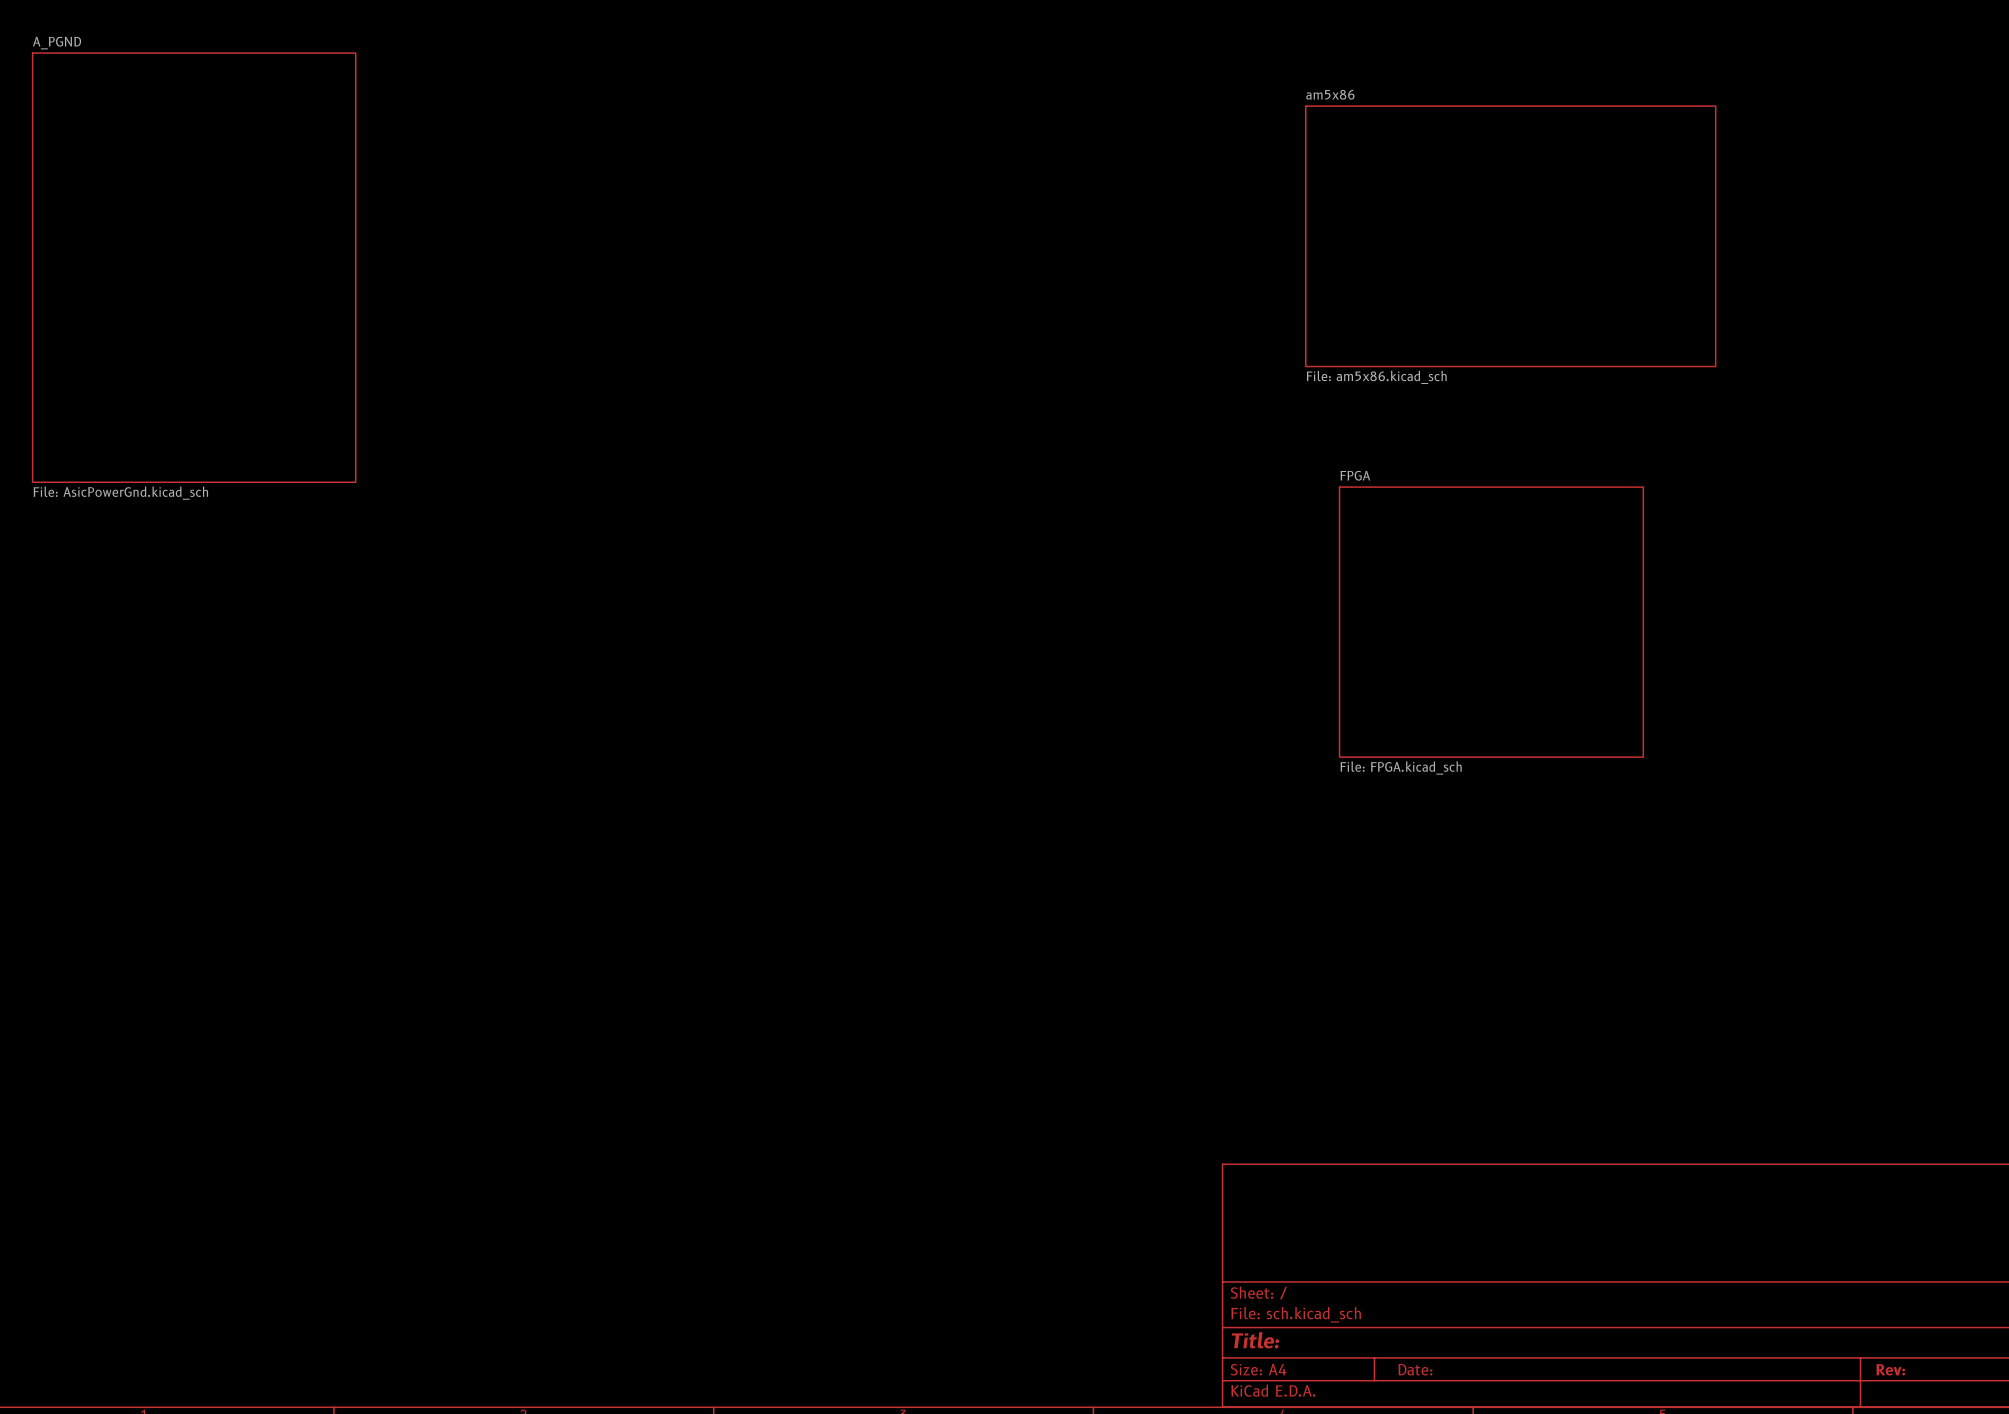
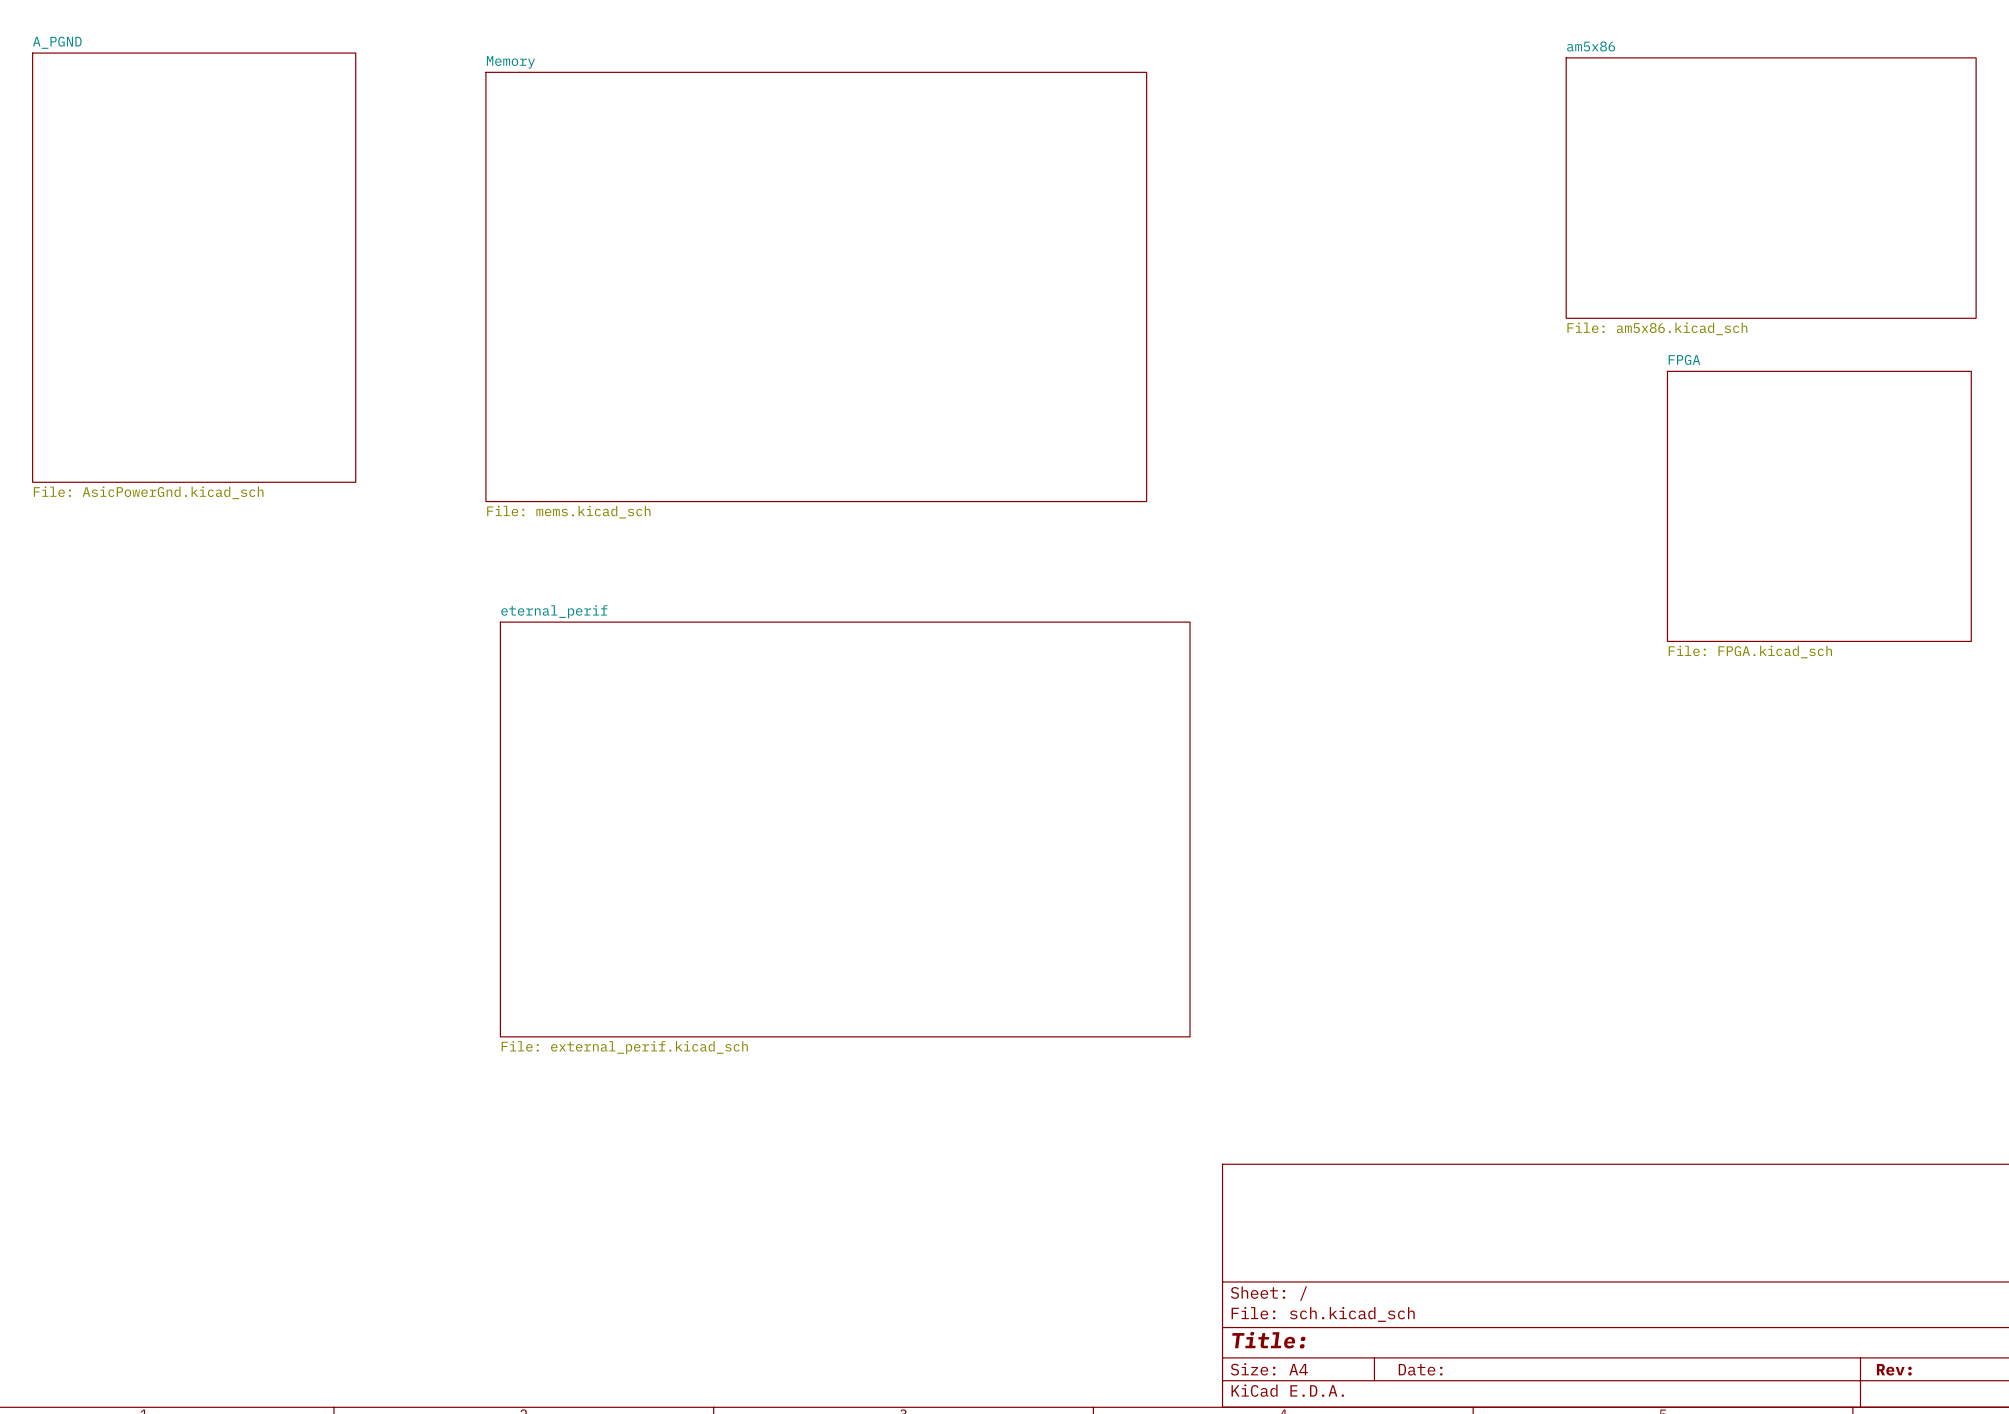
sheet am5x86 position: (1510, 236) -> (1771, 188)
sheet Memory: none -> File: mems.kicad_sch (816, 286)
sheet FPGA: none -> File: FPGA.kicad_sch (1819, 506)
sheet FPGA: File: FPGA.kicad_sch (1491, 622) -> none
sheet eternal_perif: none -> File: external_perif.kicad_sch (845, 829)

